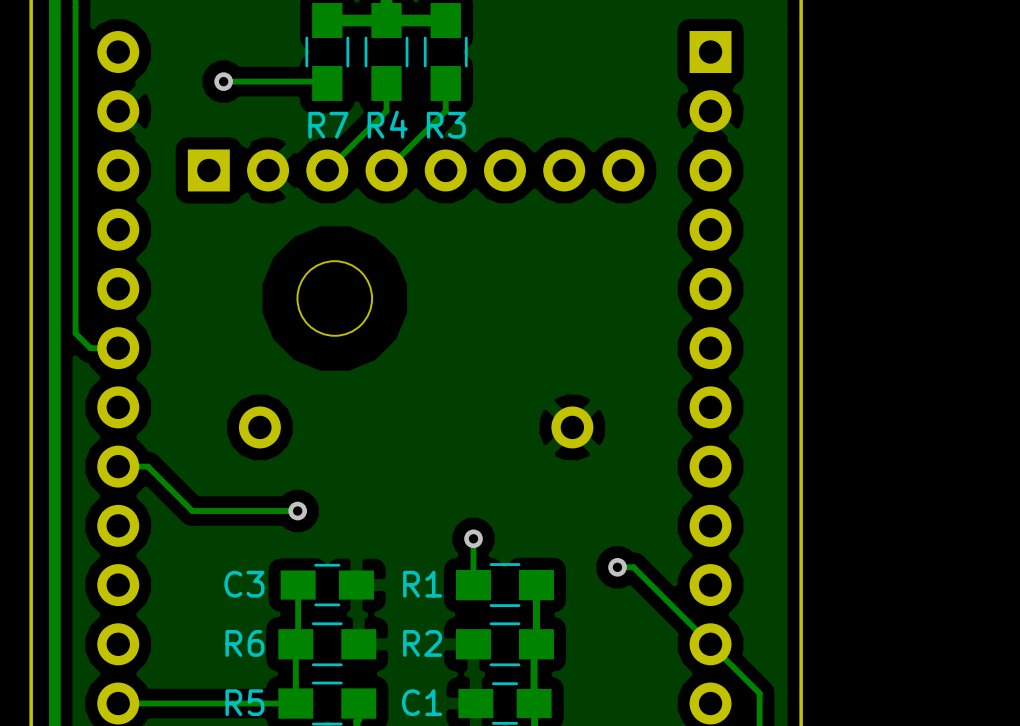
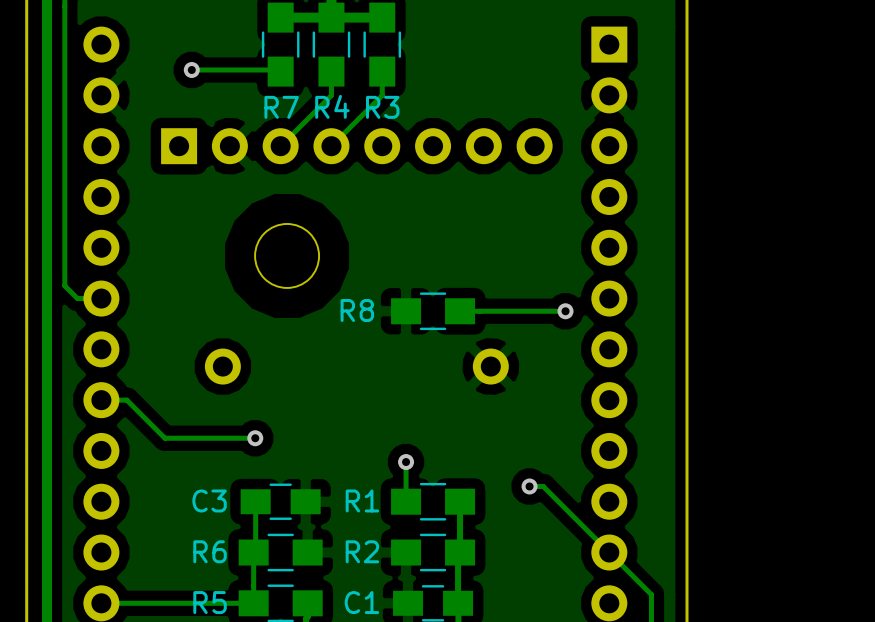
R8: none -> (433, 311)
track: none -> (565, 311) (460, 311)
via: none -> (565, 311)

